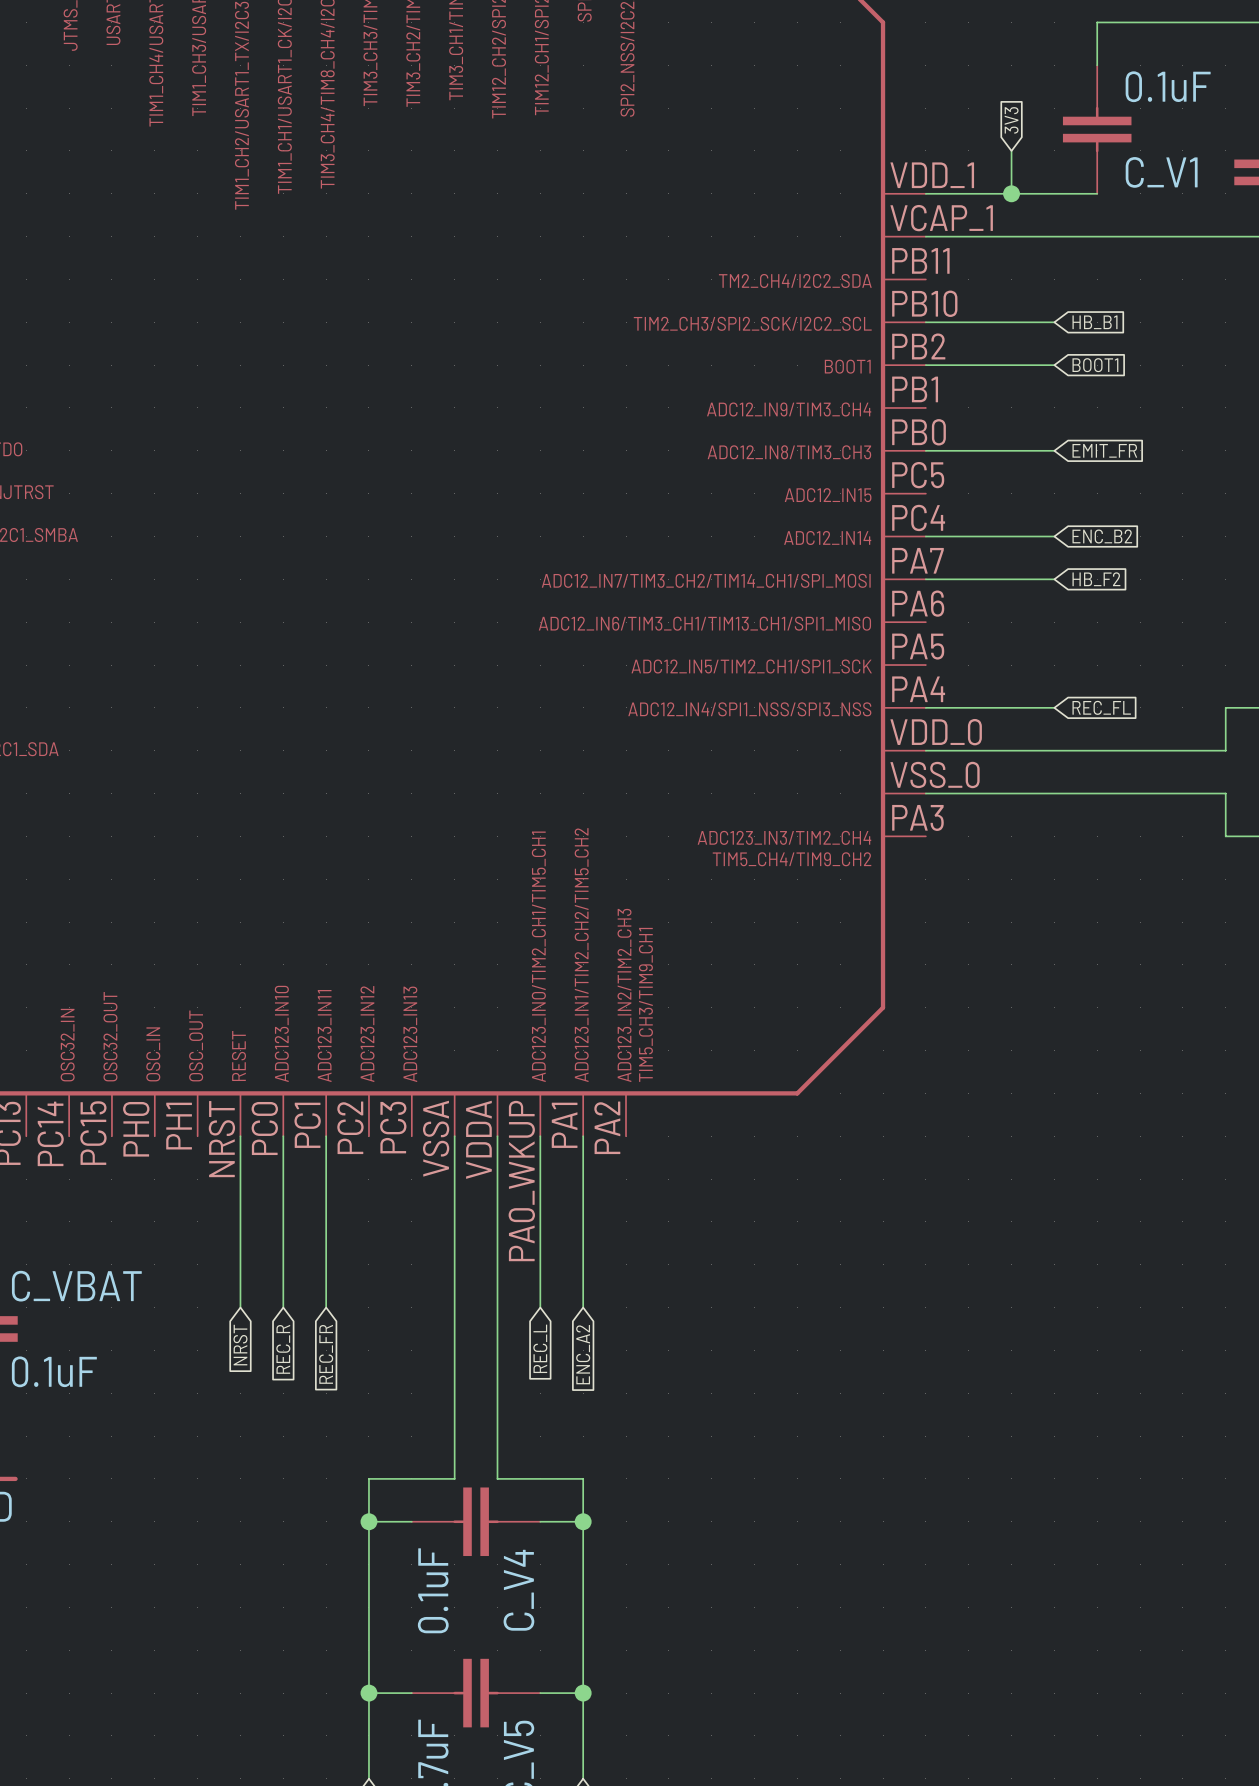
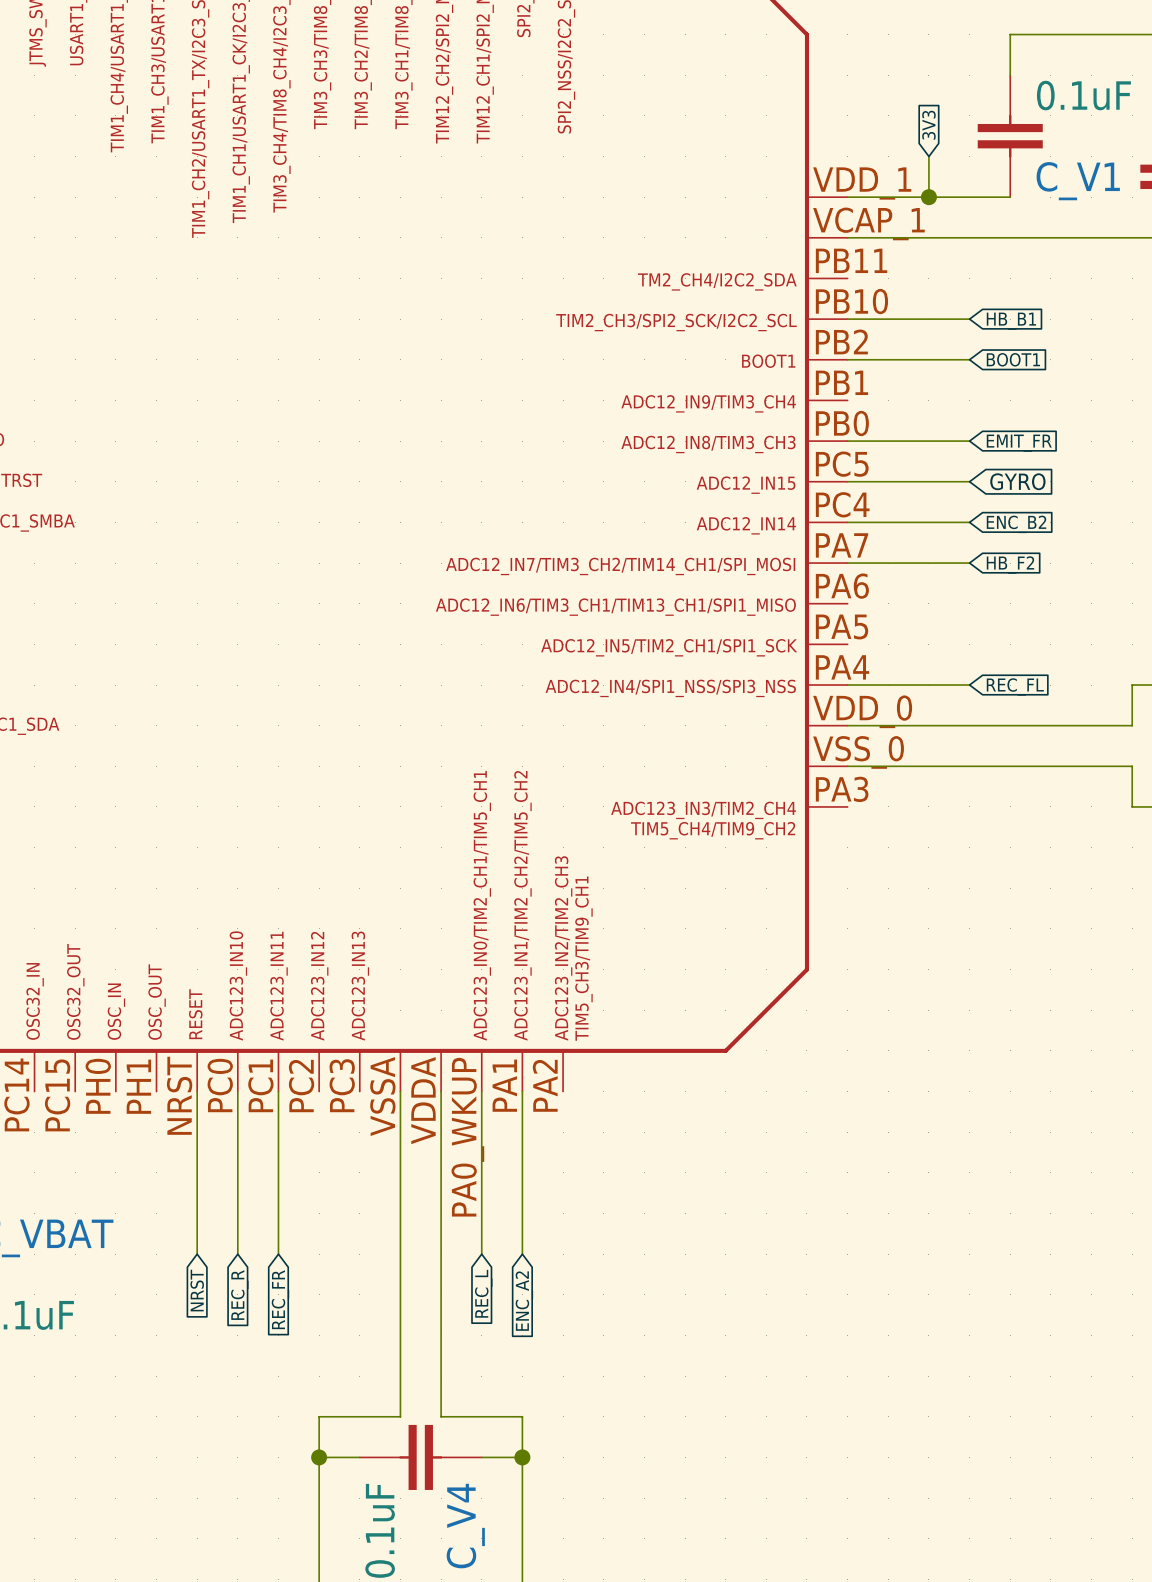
wire: none -> (847, 481) (969, 481)
global label: none -> GYRO (1017, 481)

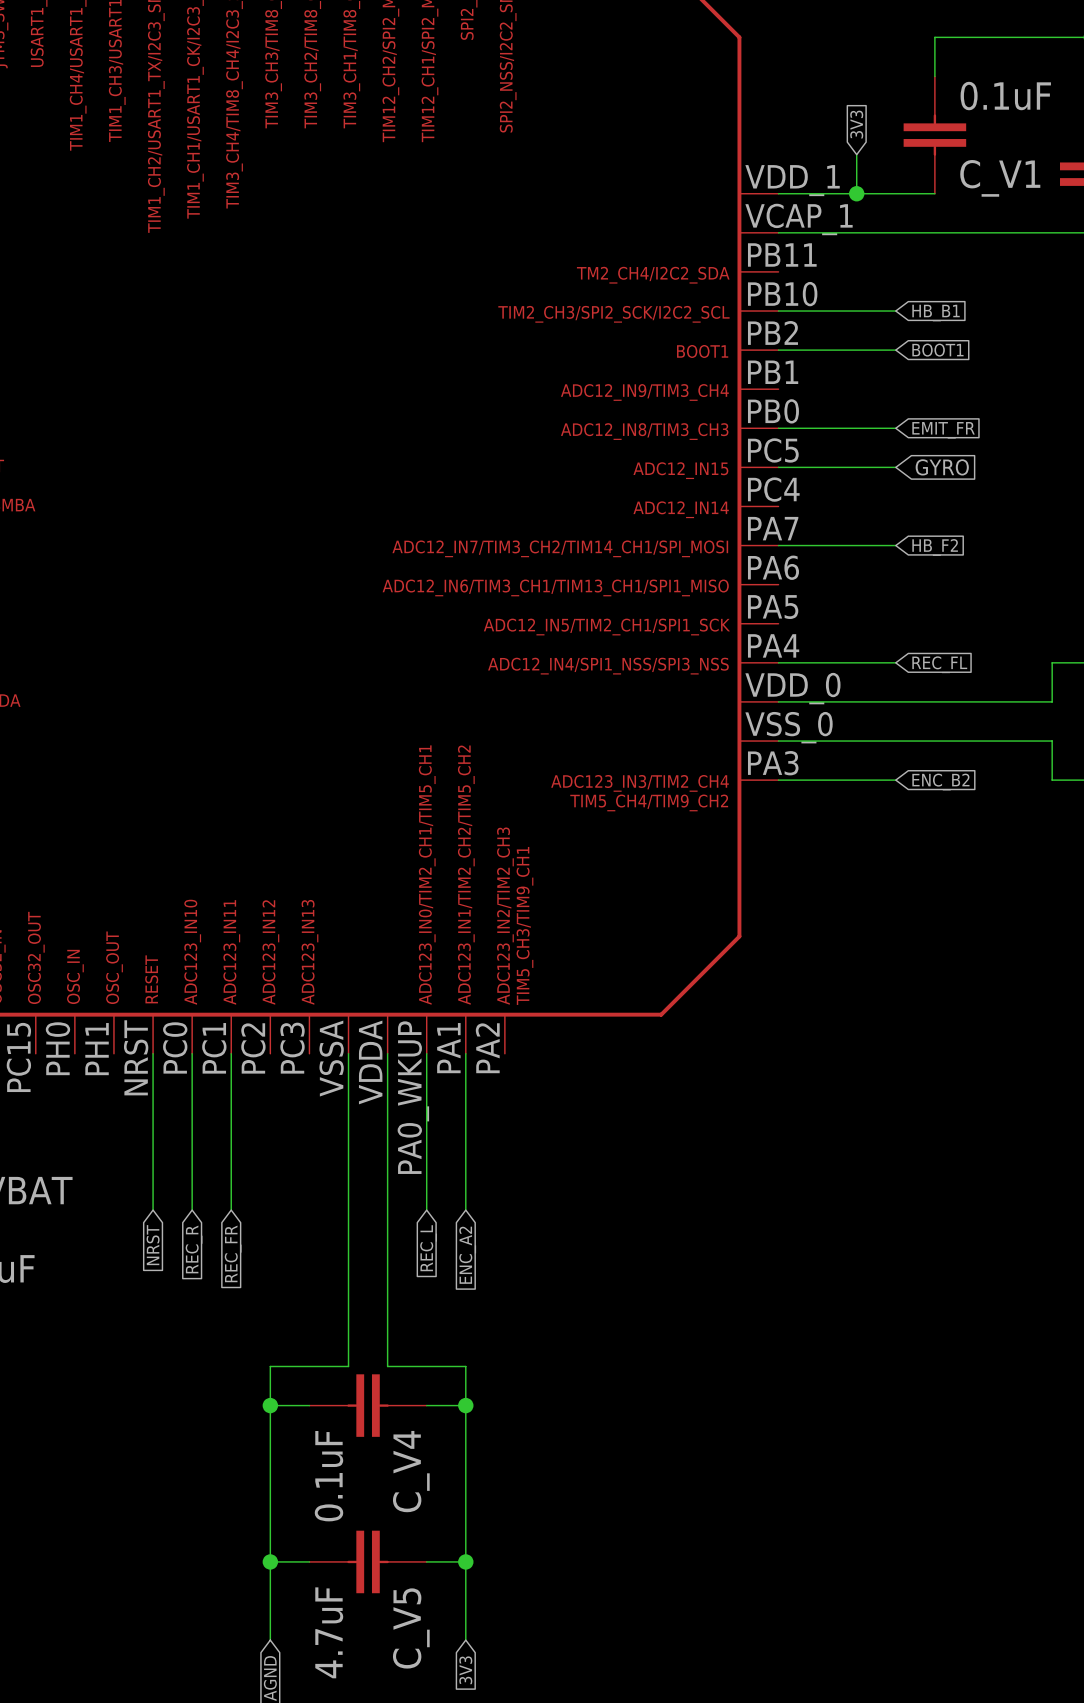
wire: (847, 522) (969, 522) -> (778, 780) (895, 780)
global label position: ENC_B2 (1016, 524) -> ENC_B2 (940, 782)

